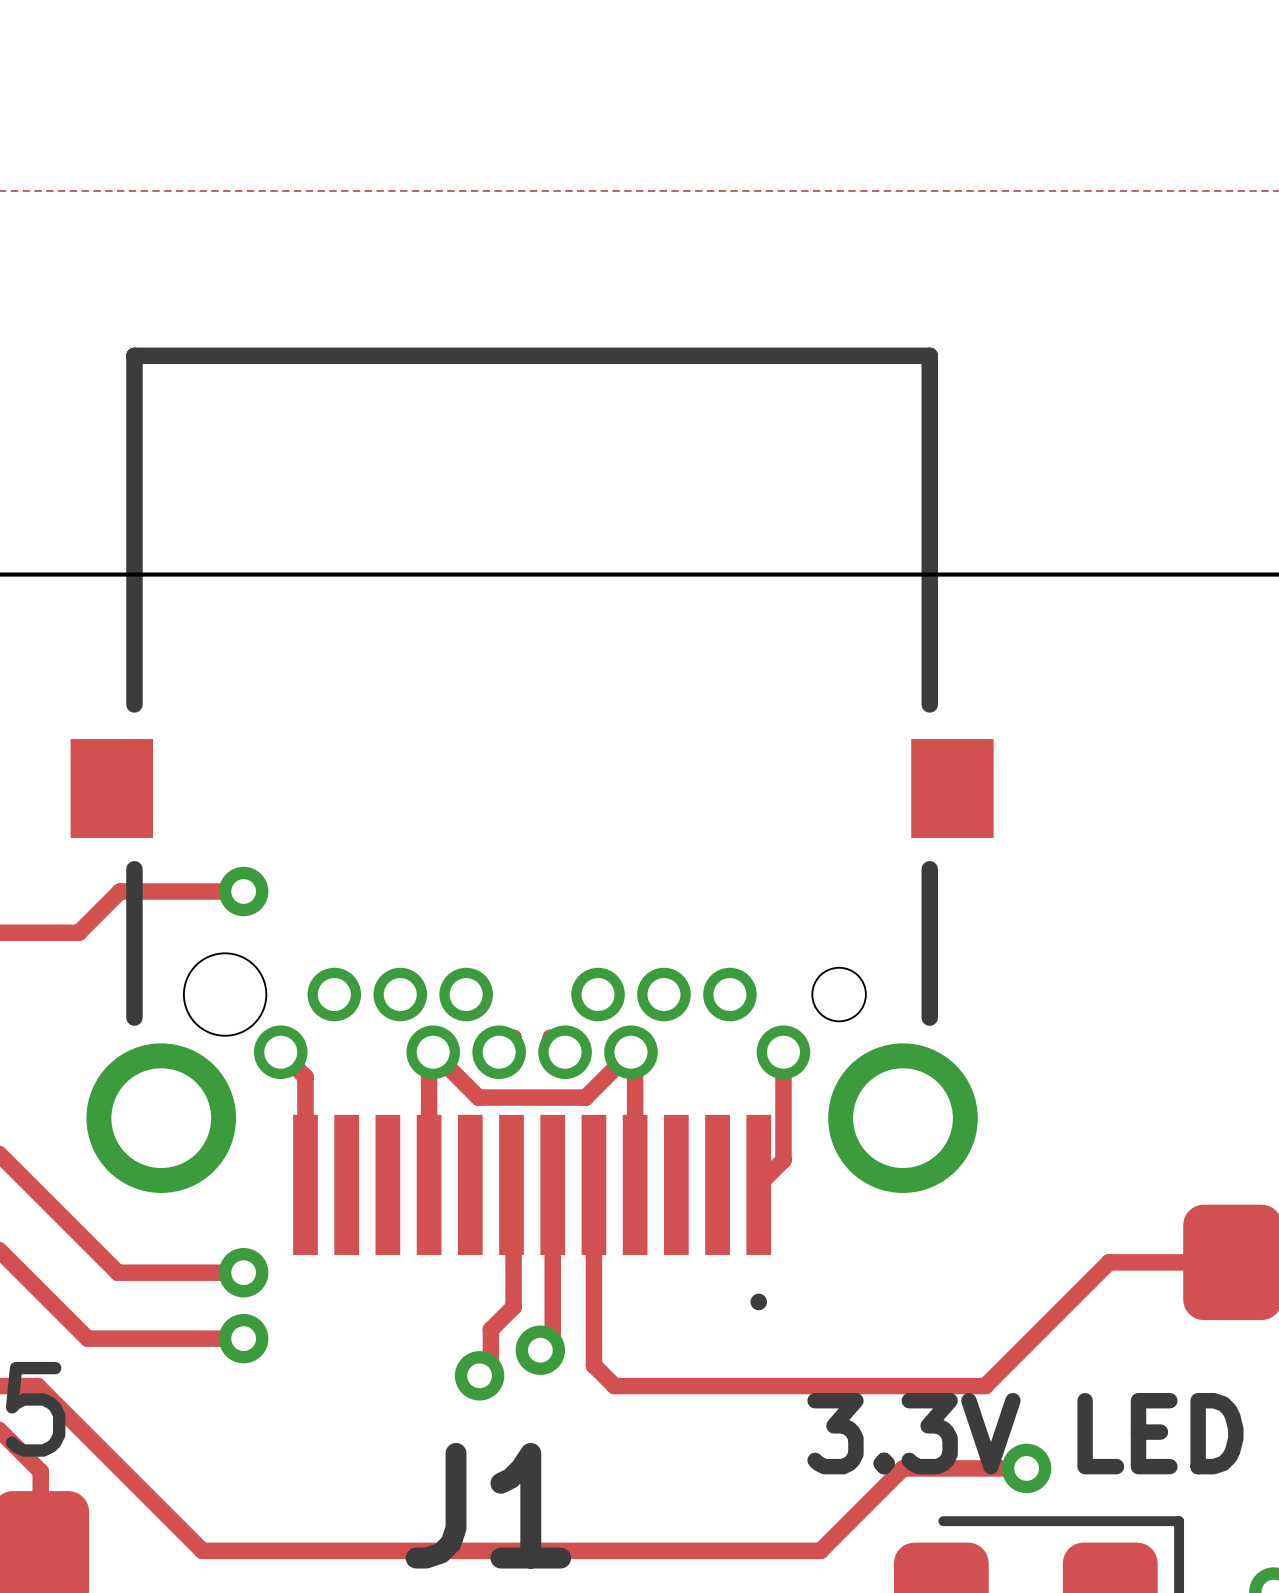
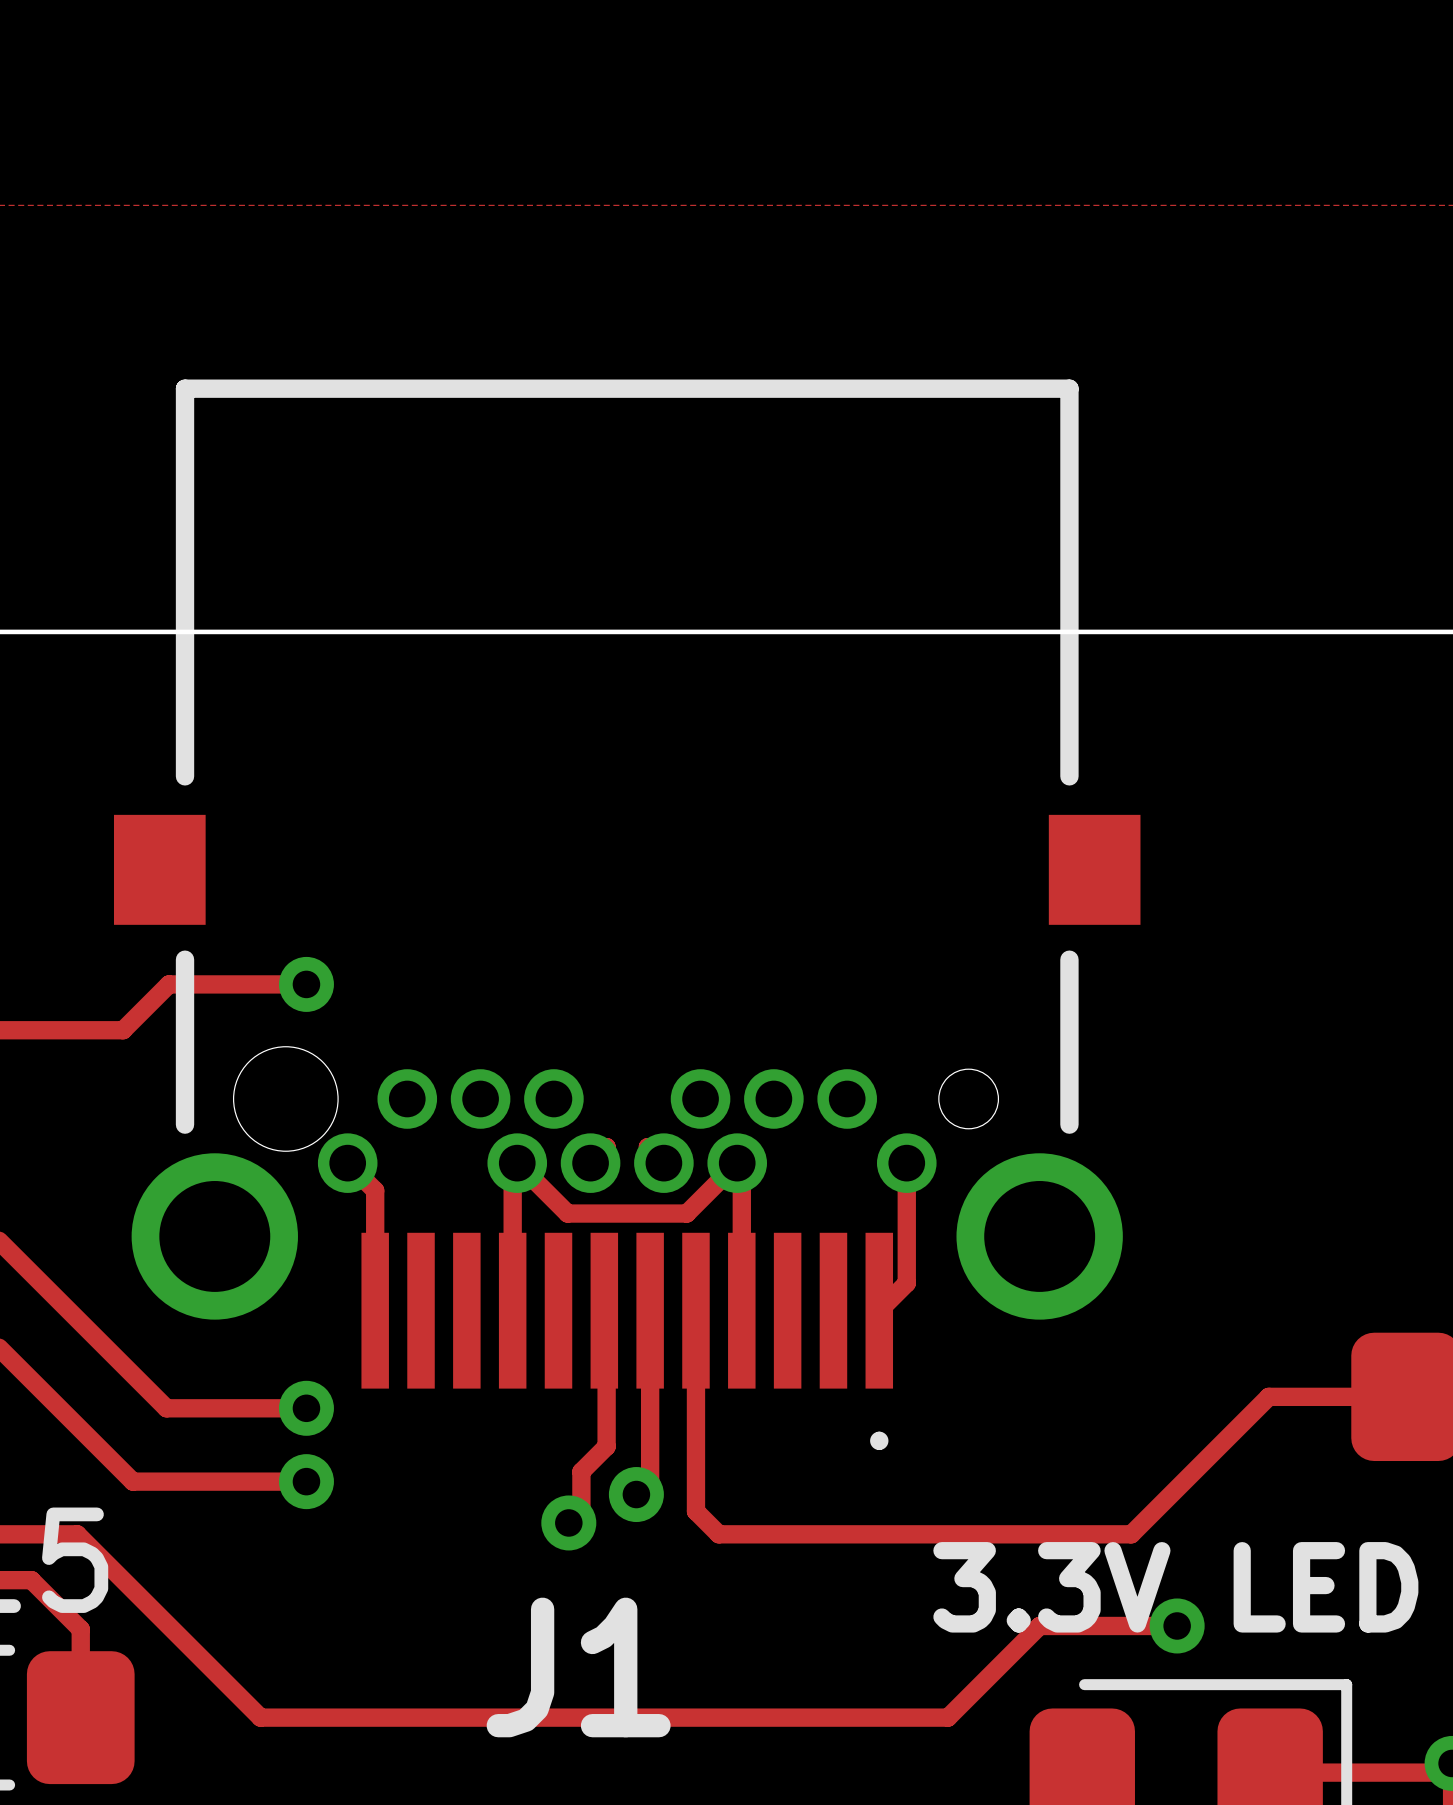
J1 footprint: [70, 347, 994, 1311] -> [113, 379, 1141, 1451]

